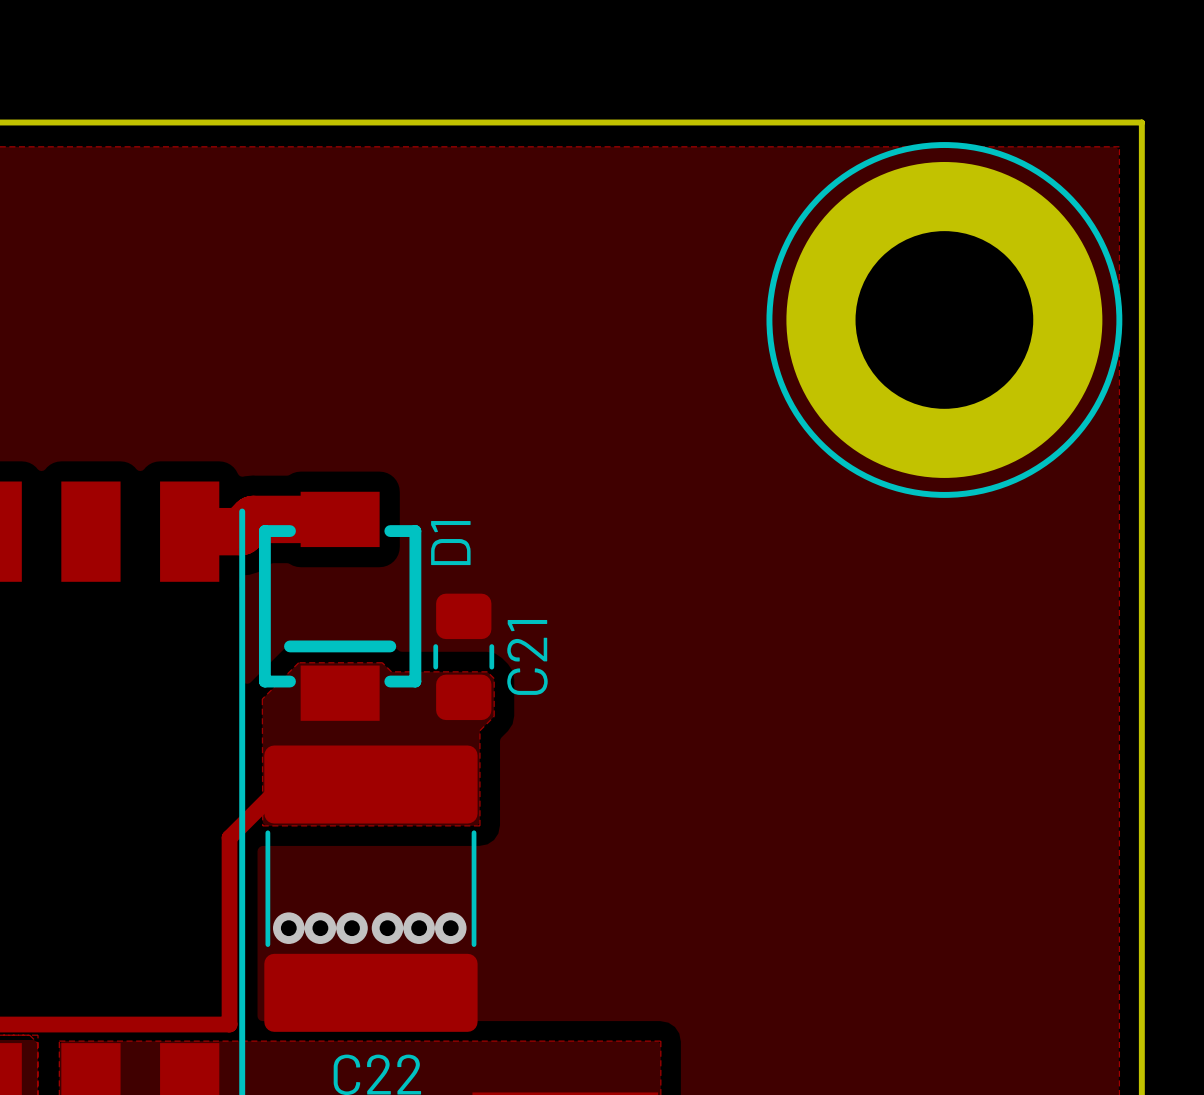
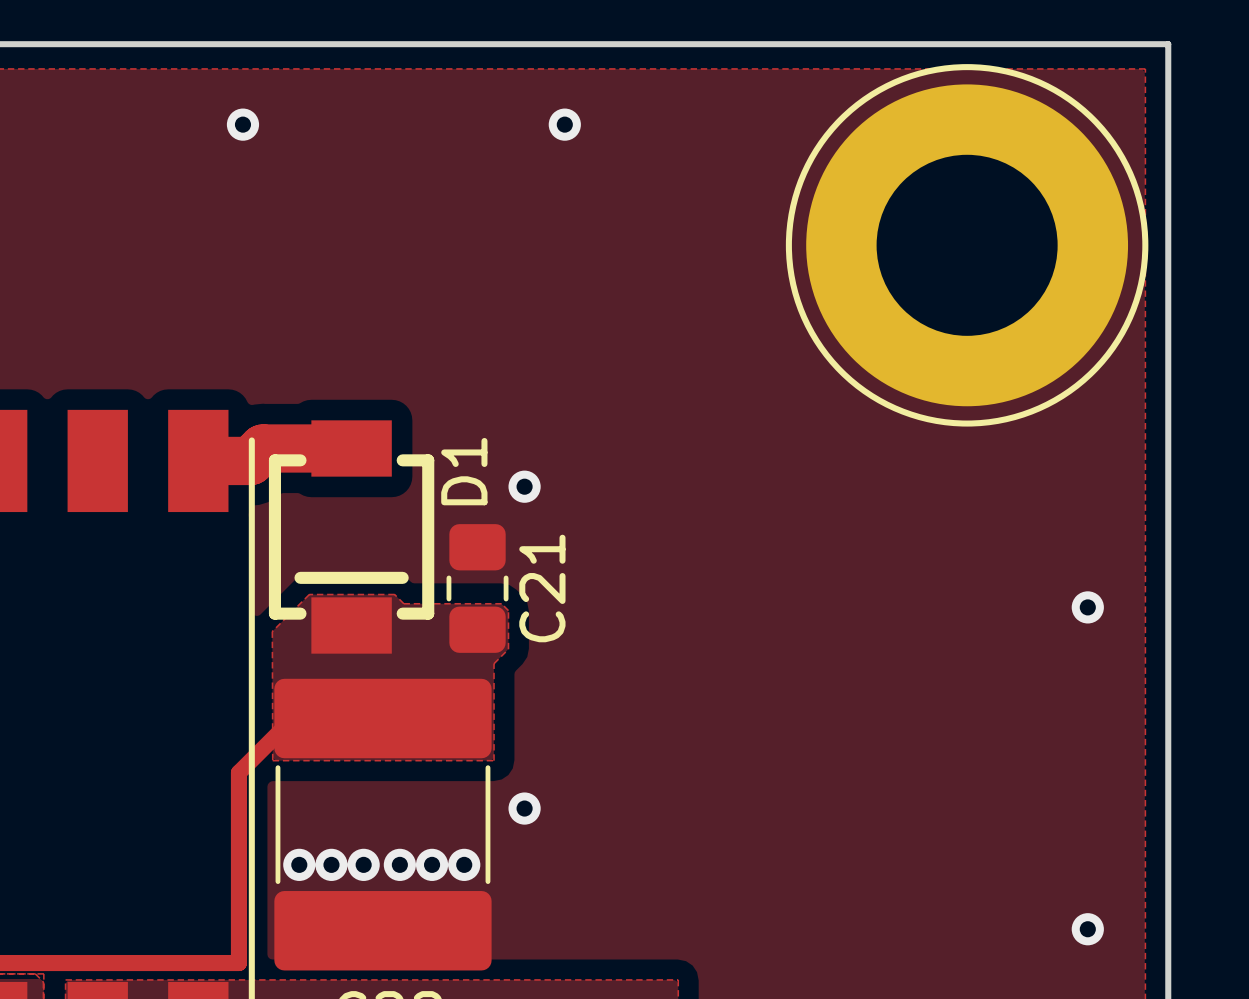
via: none -> (242, 124)
via: none -> (564, 124)
via: none -> (524, 486)
via: none -> (1087, 607)
via: none -> (524, 808)
via: none -> (1087, 929)

